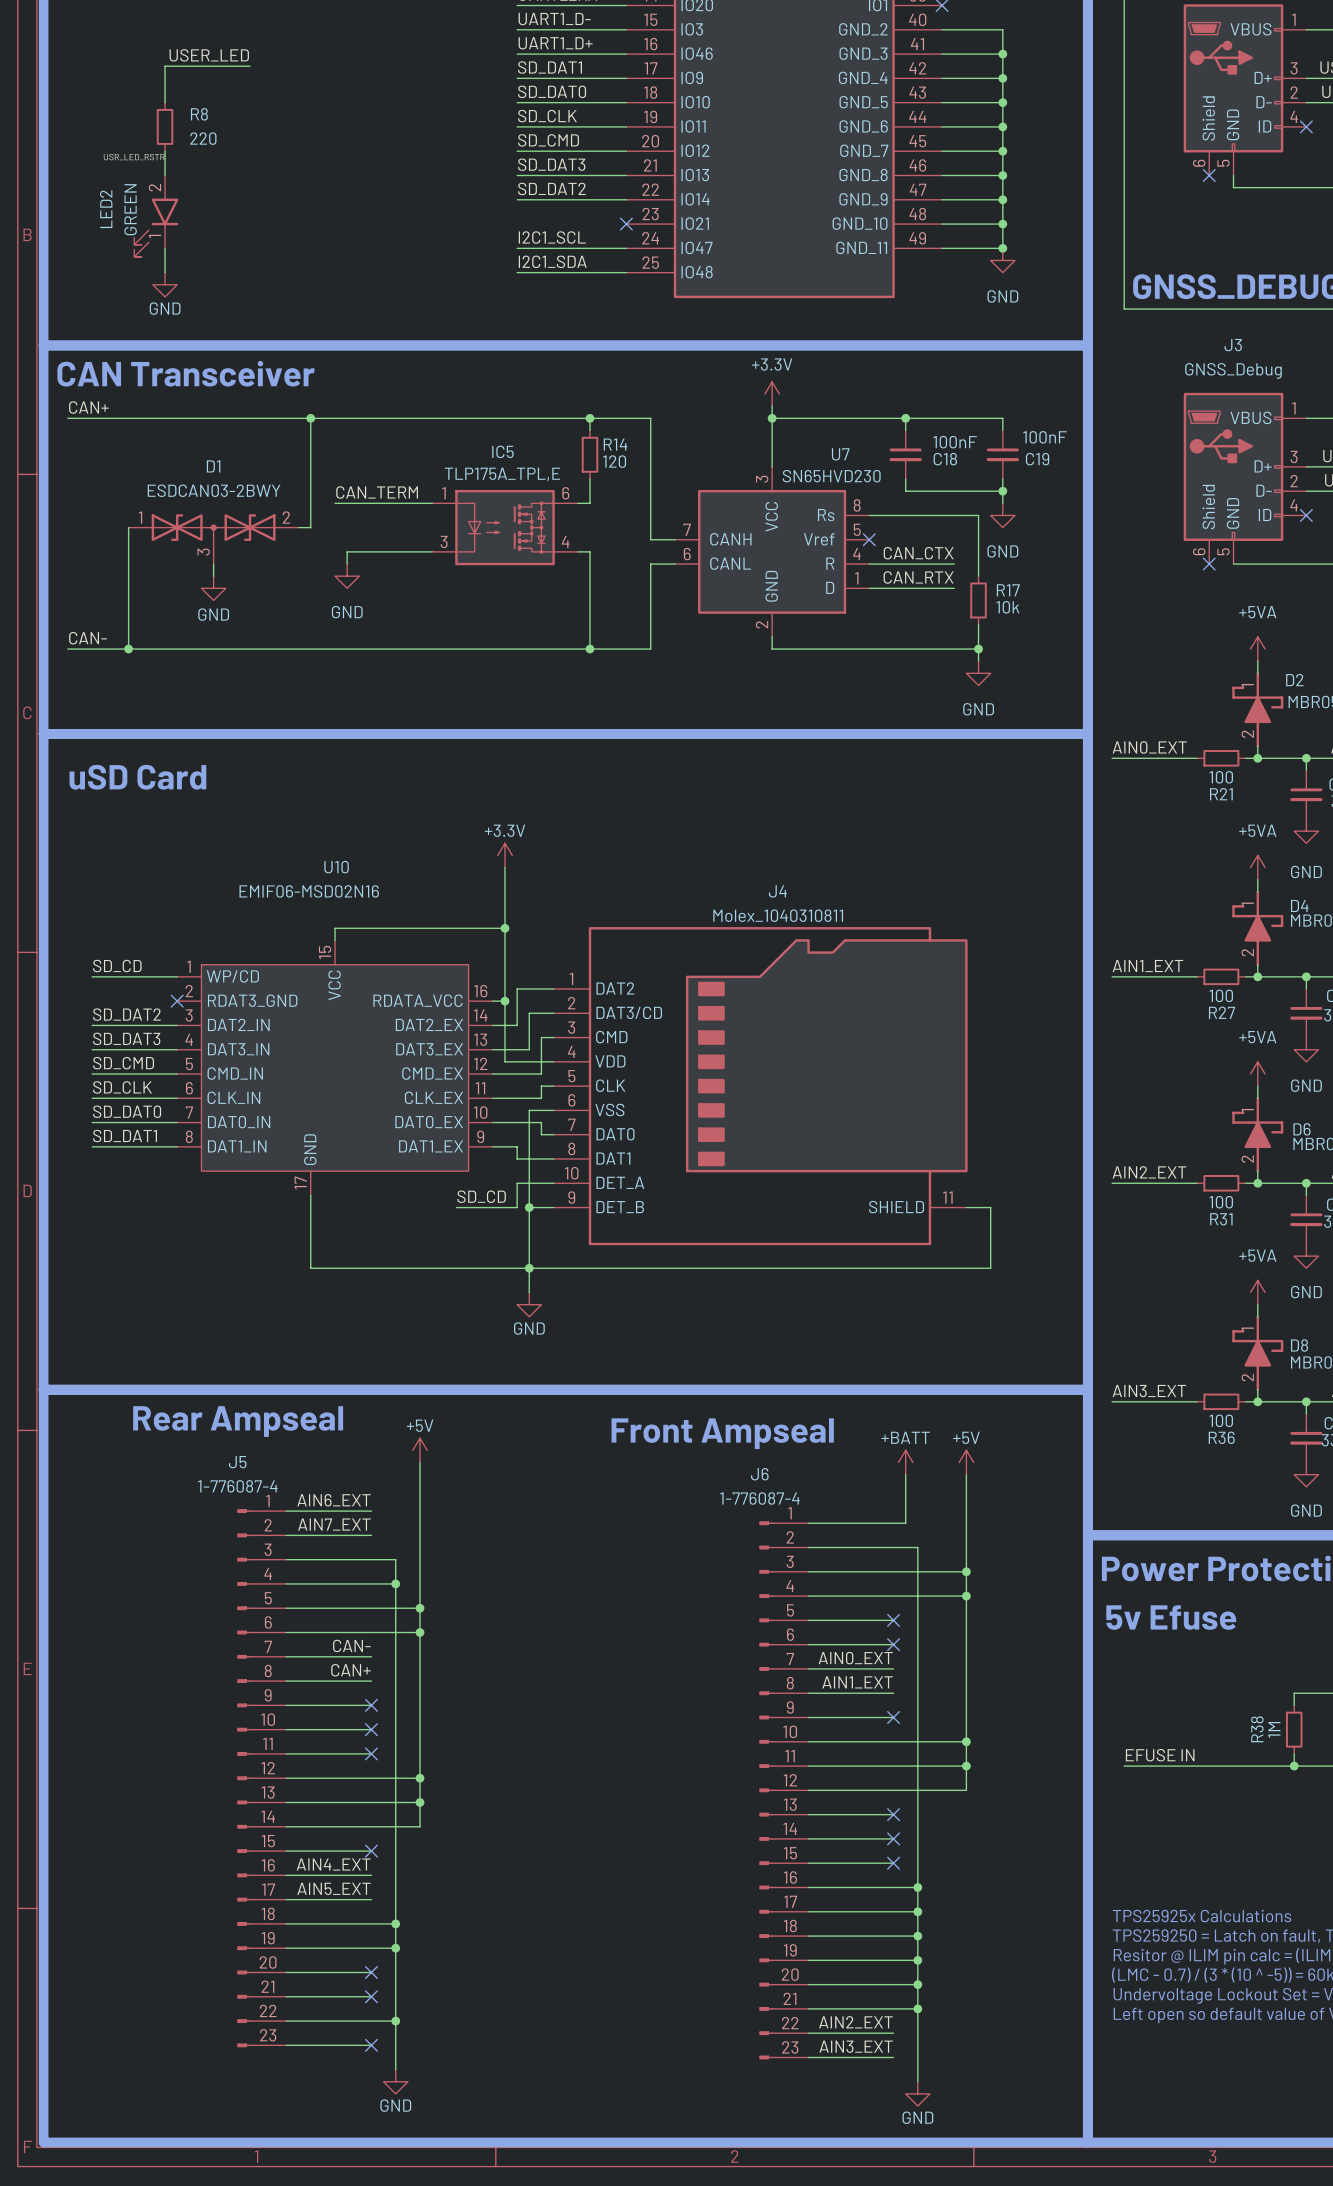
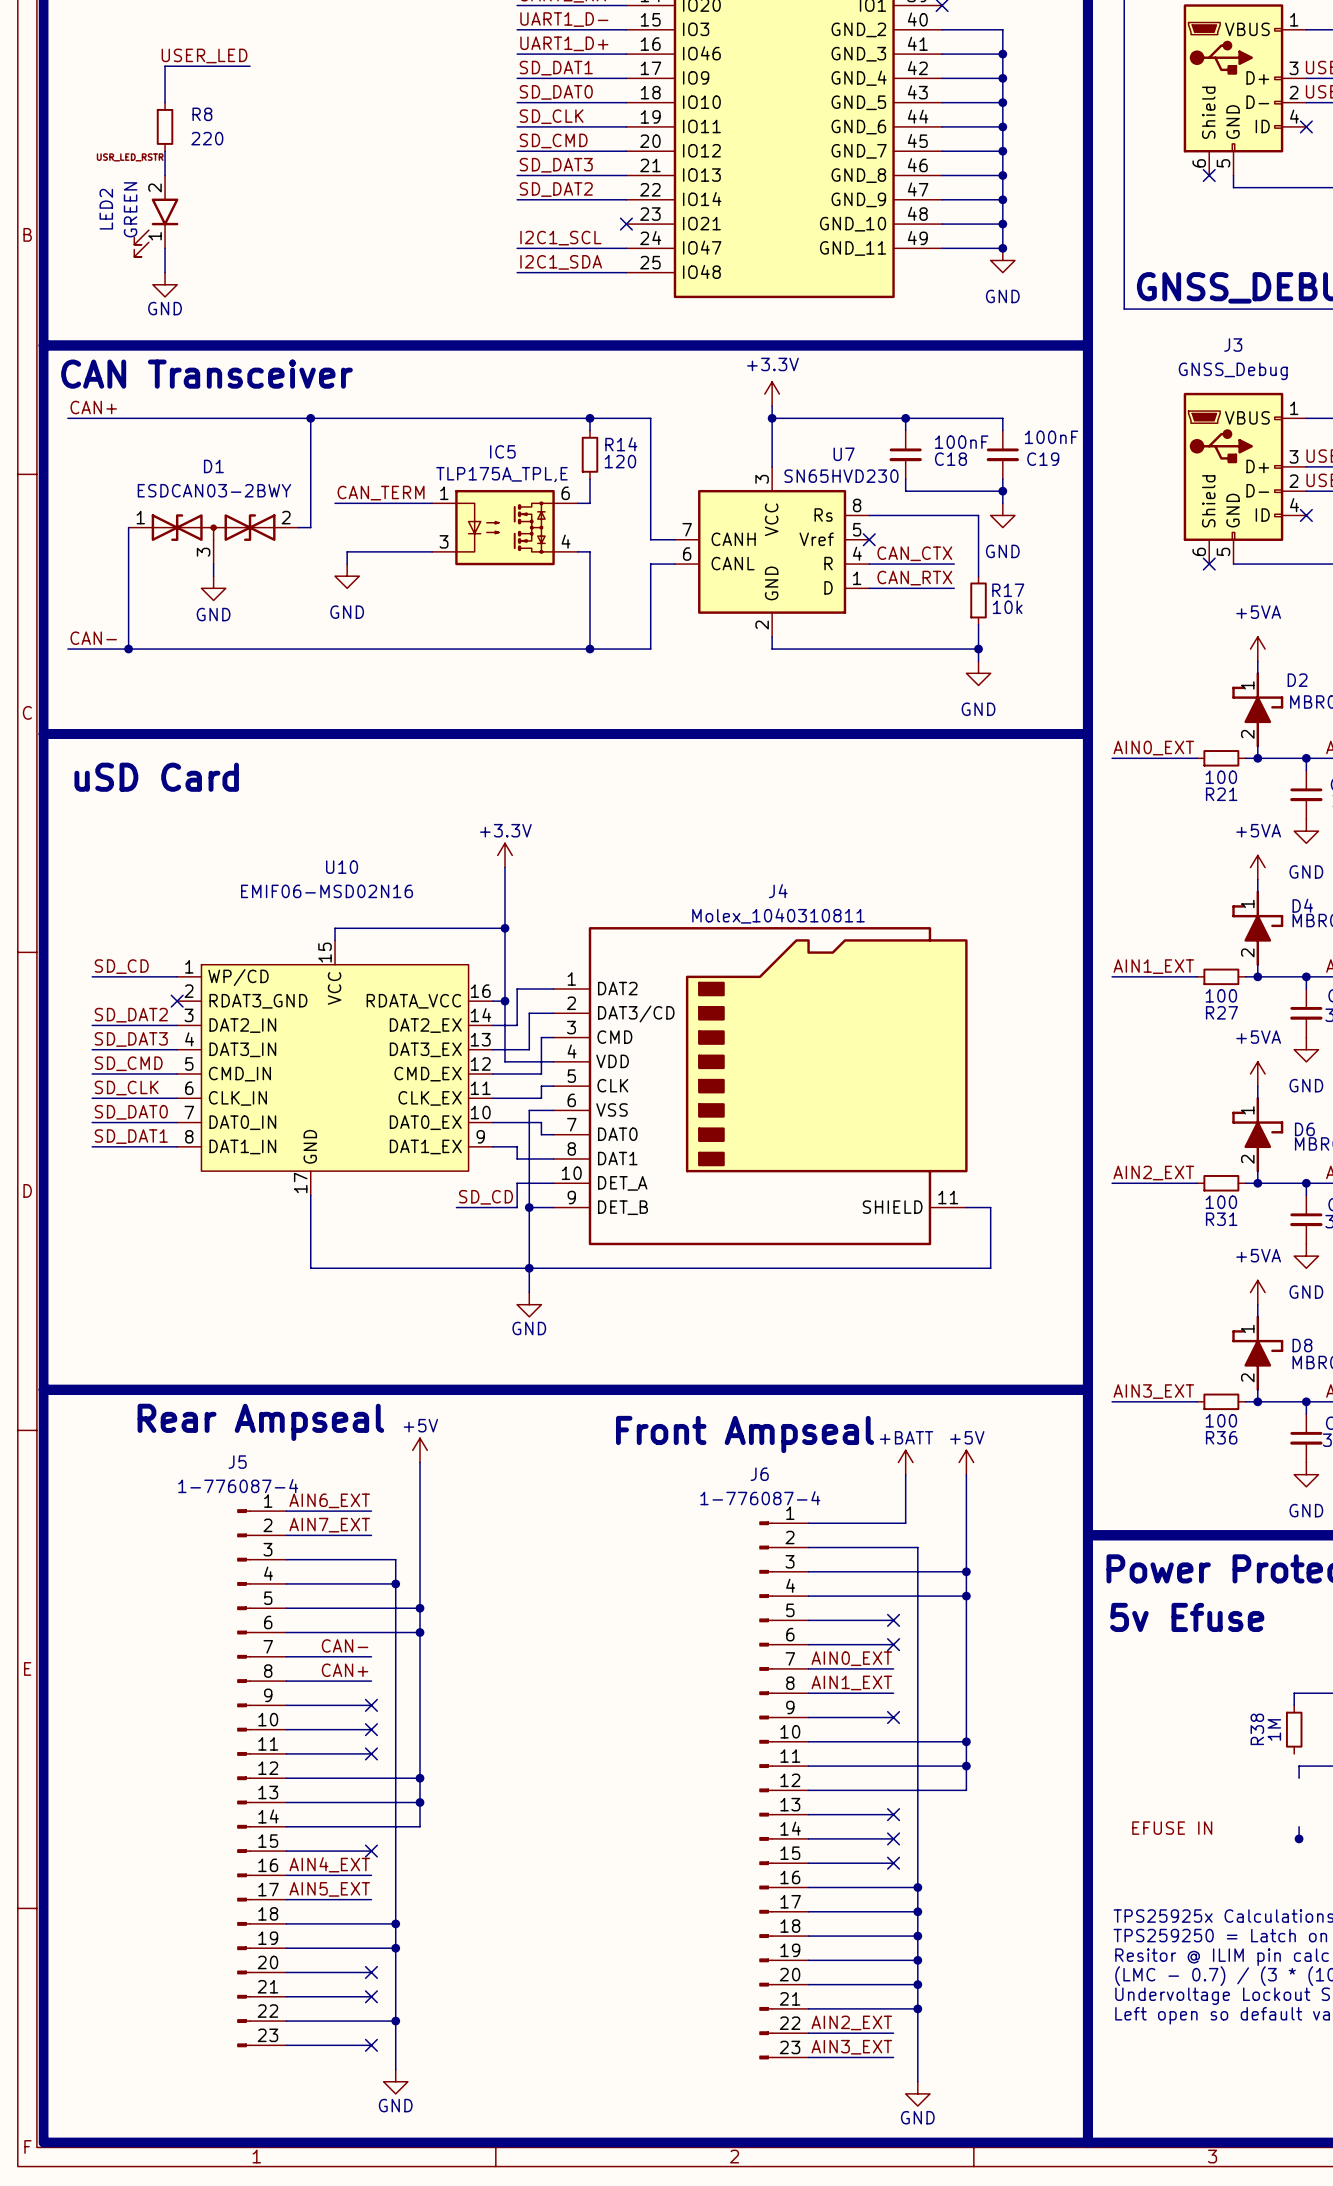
wire: (1294, 1753) (1294, 1766) -> (1299, 1826) (1299, 1838)
label position: EFUSE IN (1160, 1755) -> EFUSE IN (1172, 1828)
wire: (1124, 1766) (1299, 1766) -> (1299, 1778) (1299, 1766)
junction: (1294, 1766) -> none
junction: none -> (1299, 1838)

